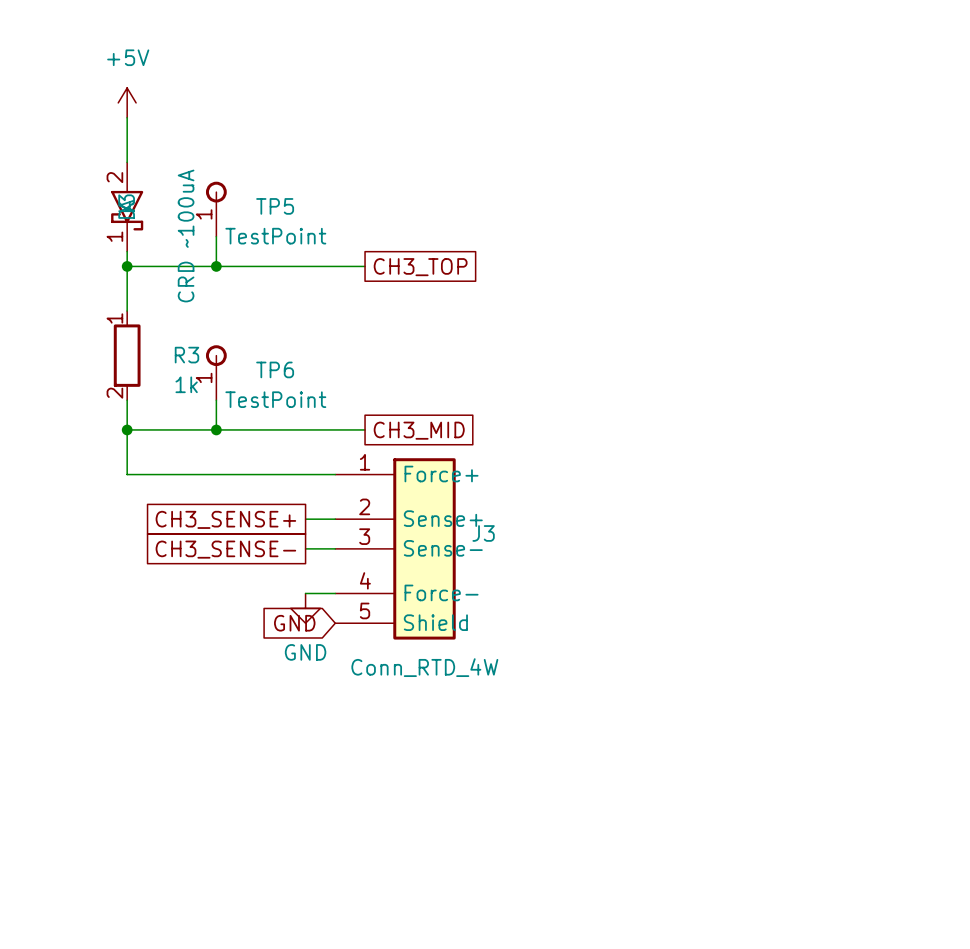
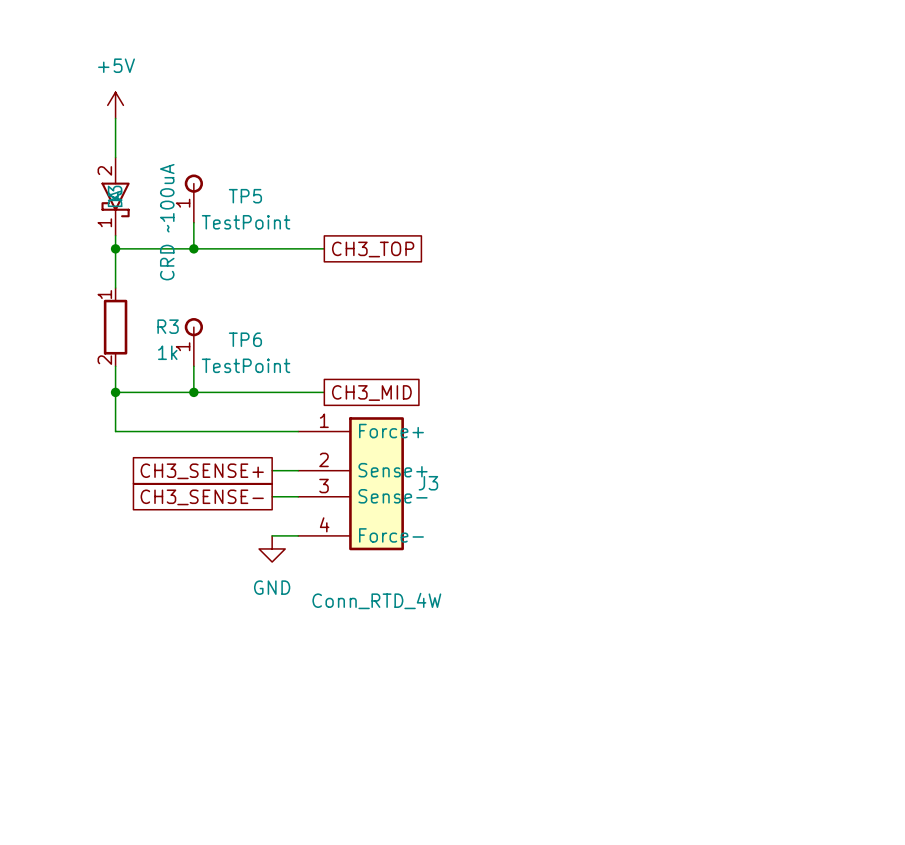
J3 symbol: [335, 458, 456, 640] -> [298, 417, 404, 551]
global label: GND (294, 623) -> none

